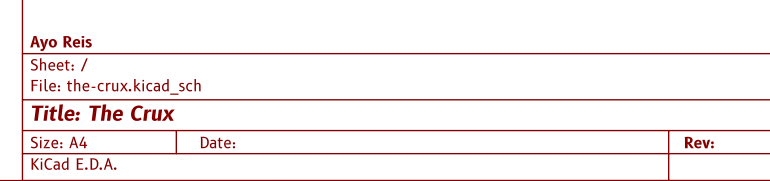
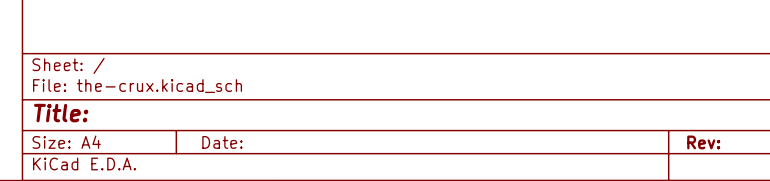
title block: Ayo Reis (61, 43) -> none
title block: Title: The Crux (103, 112) -> Title: (61, 113)

